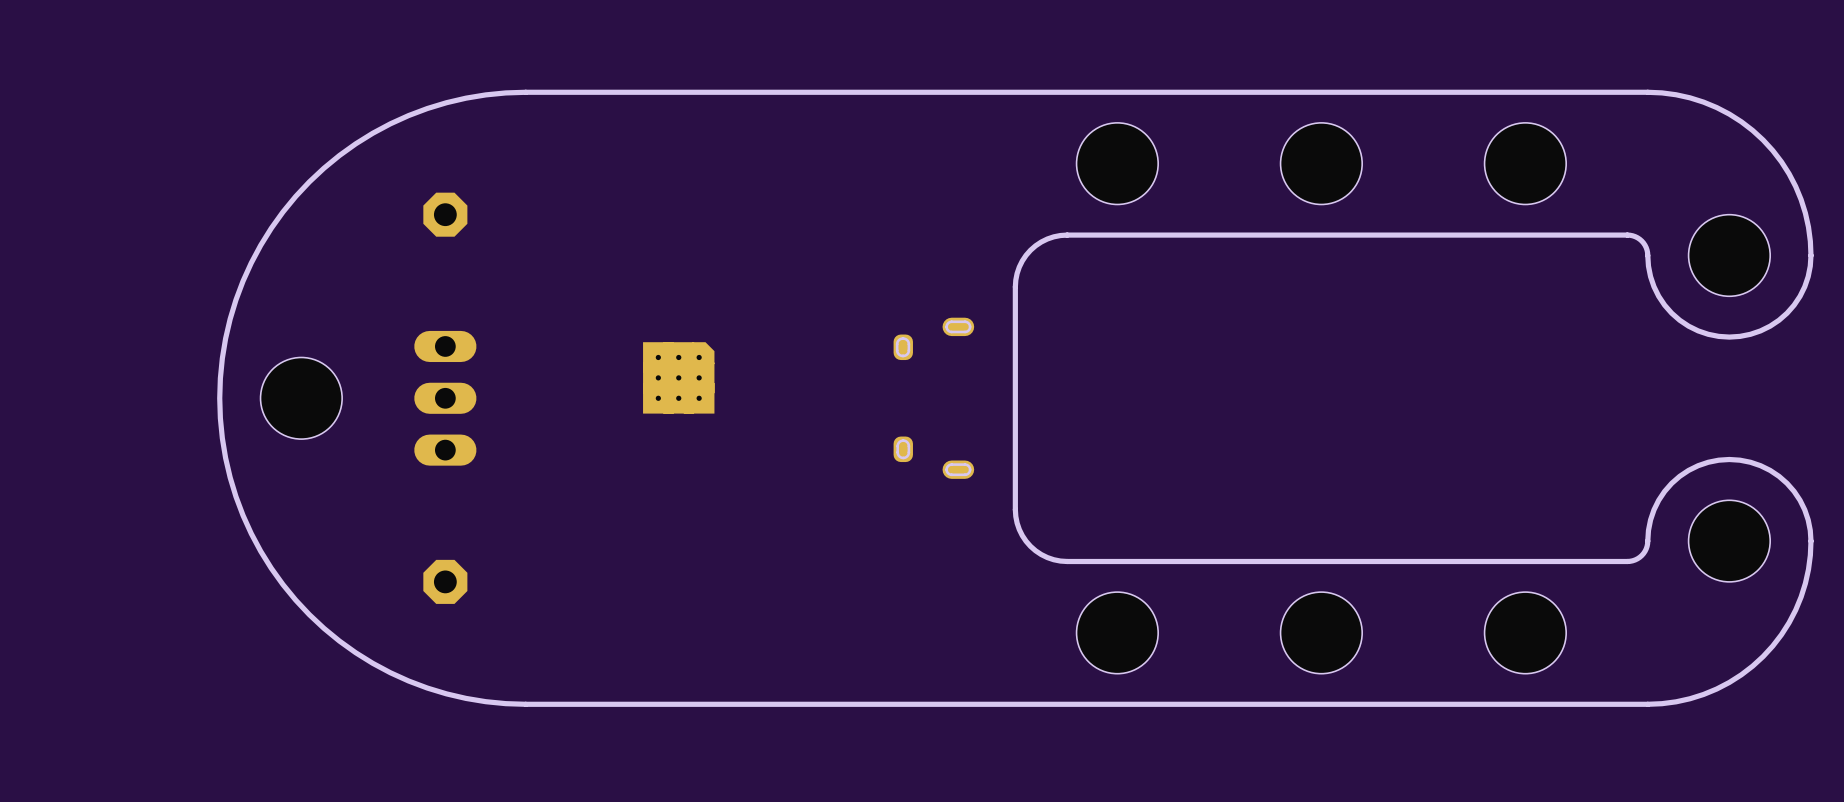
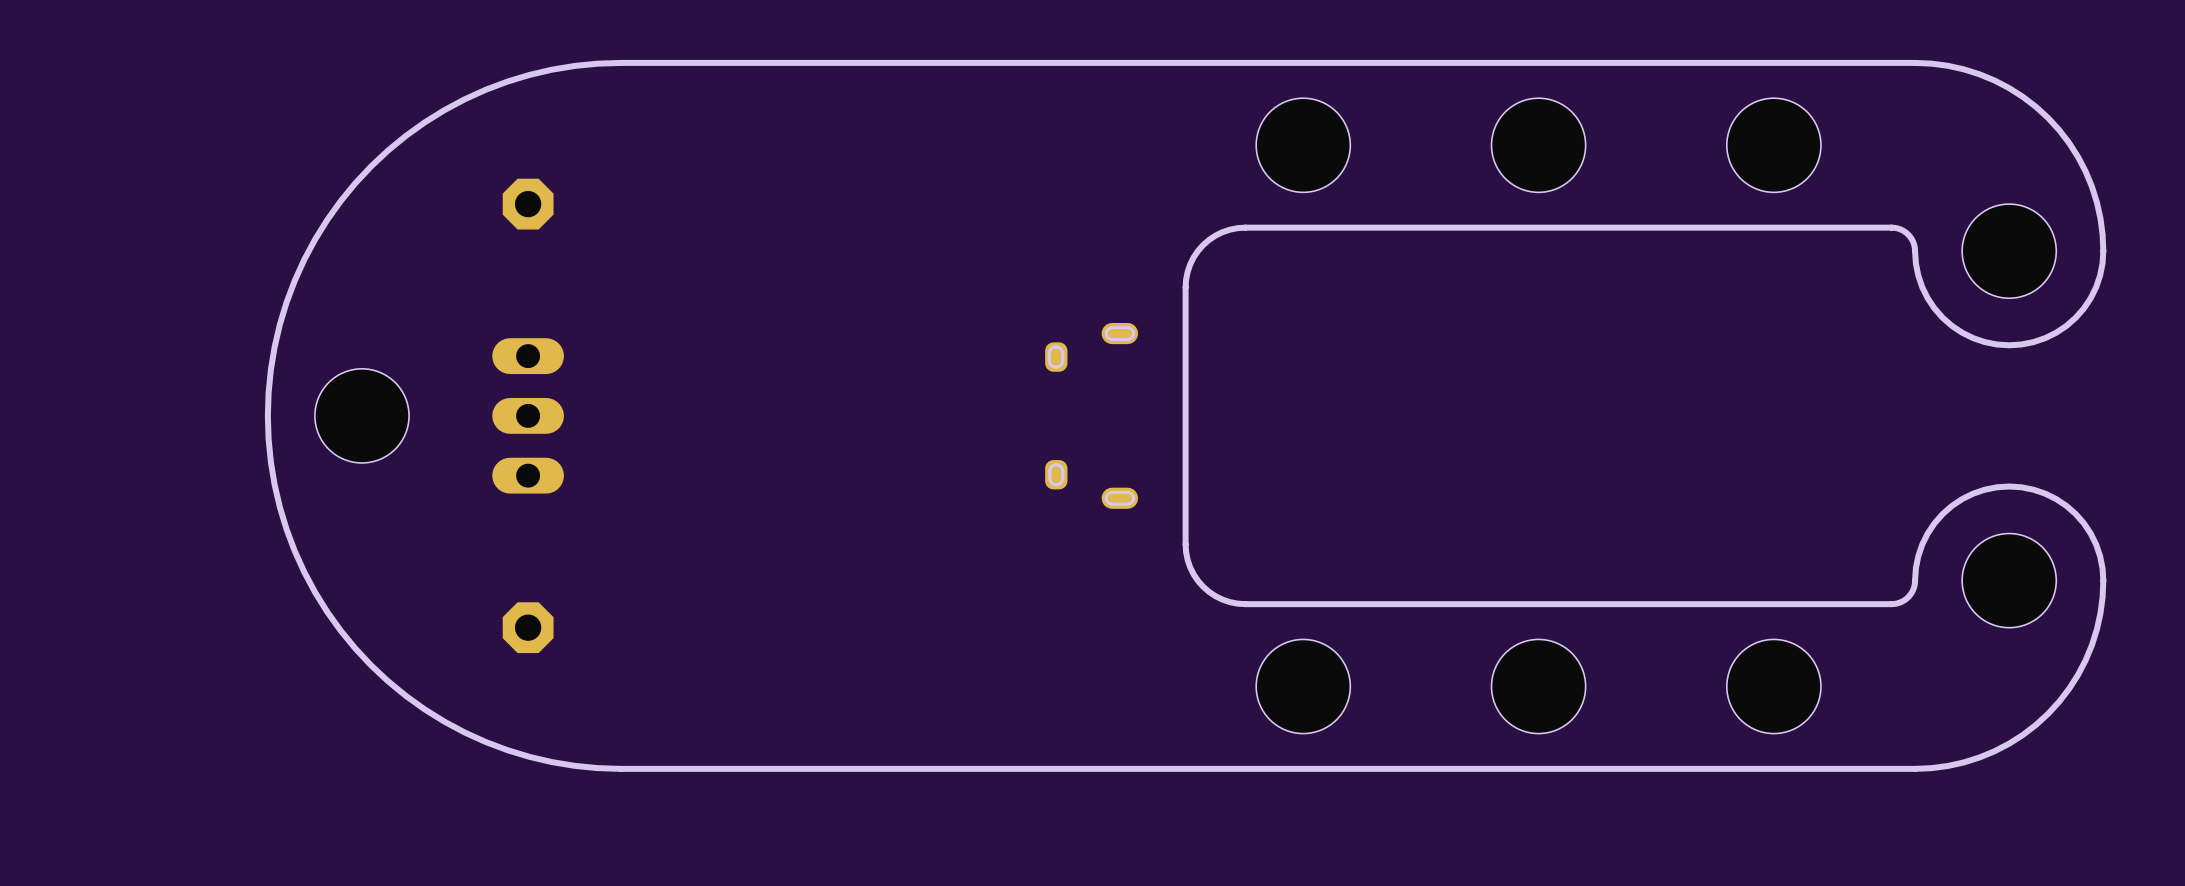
part: (678, 377) -> none

